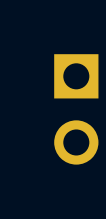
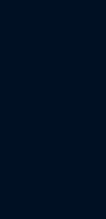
part: (76, 109) -> none

